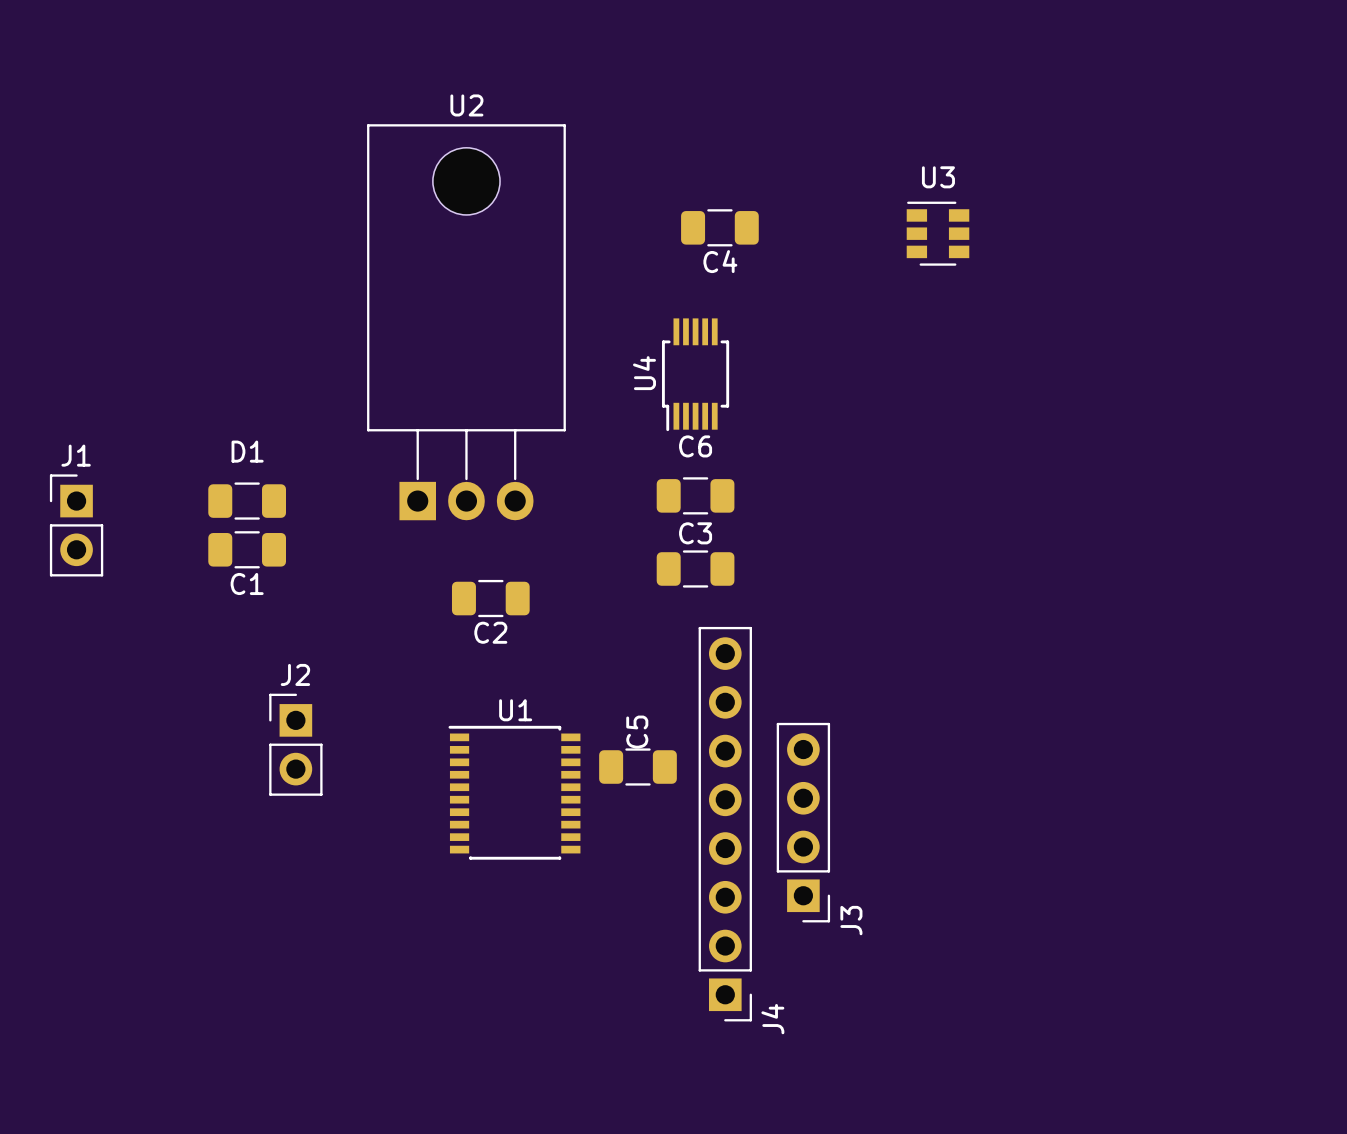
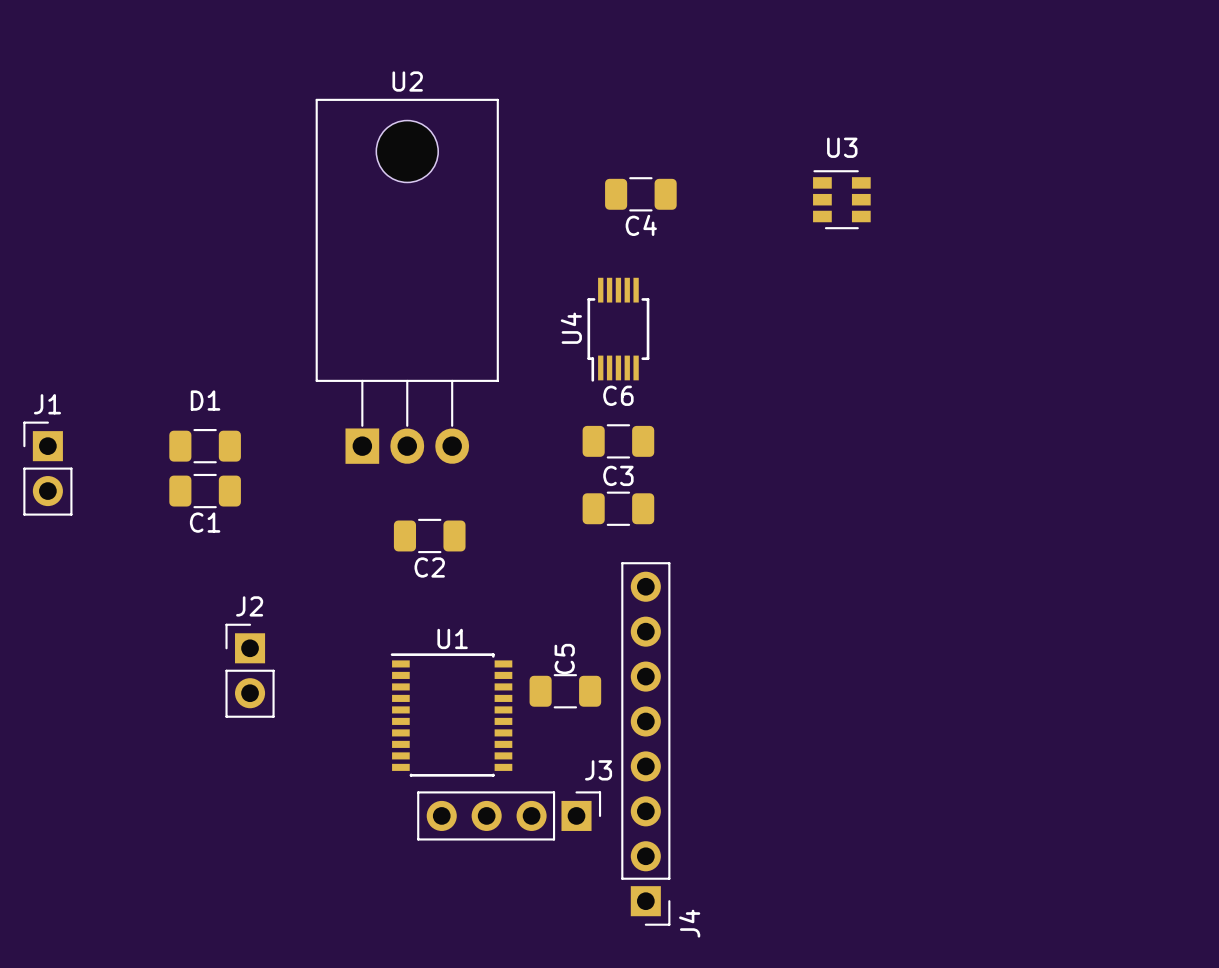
J3 rotation: 0° (803, 822) -> 90° counterclockwise (509, 815)
J3 position: (803, 822) -> (509, 815)

